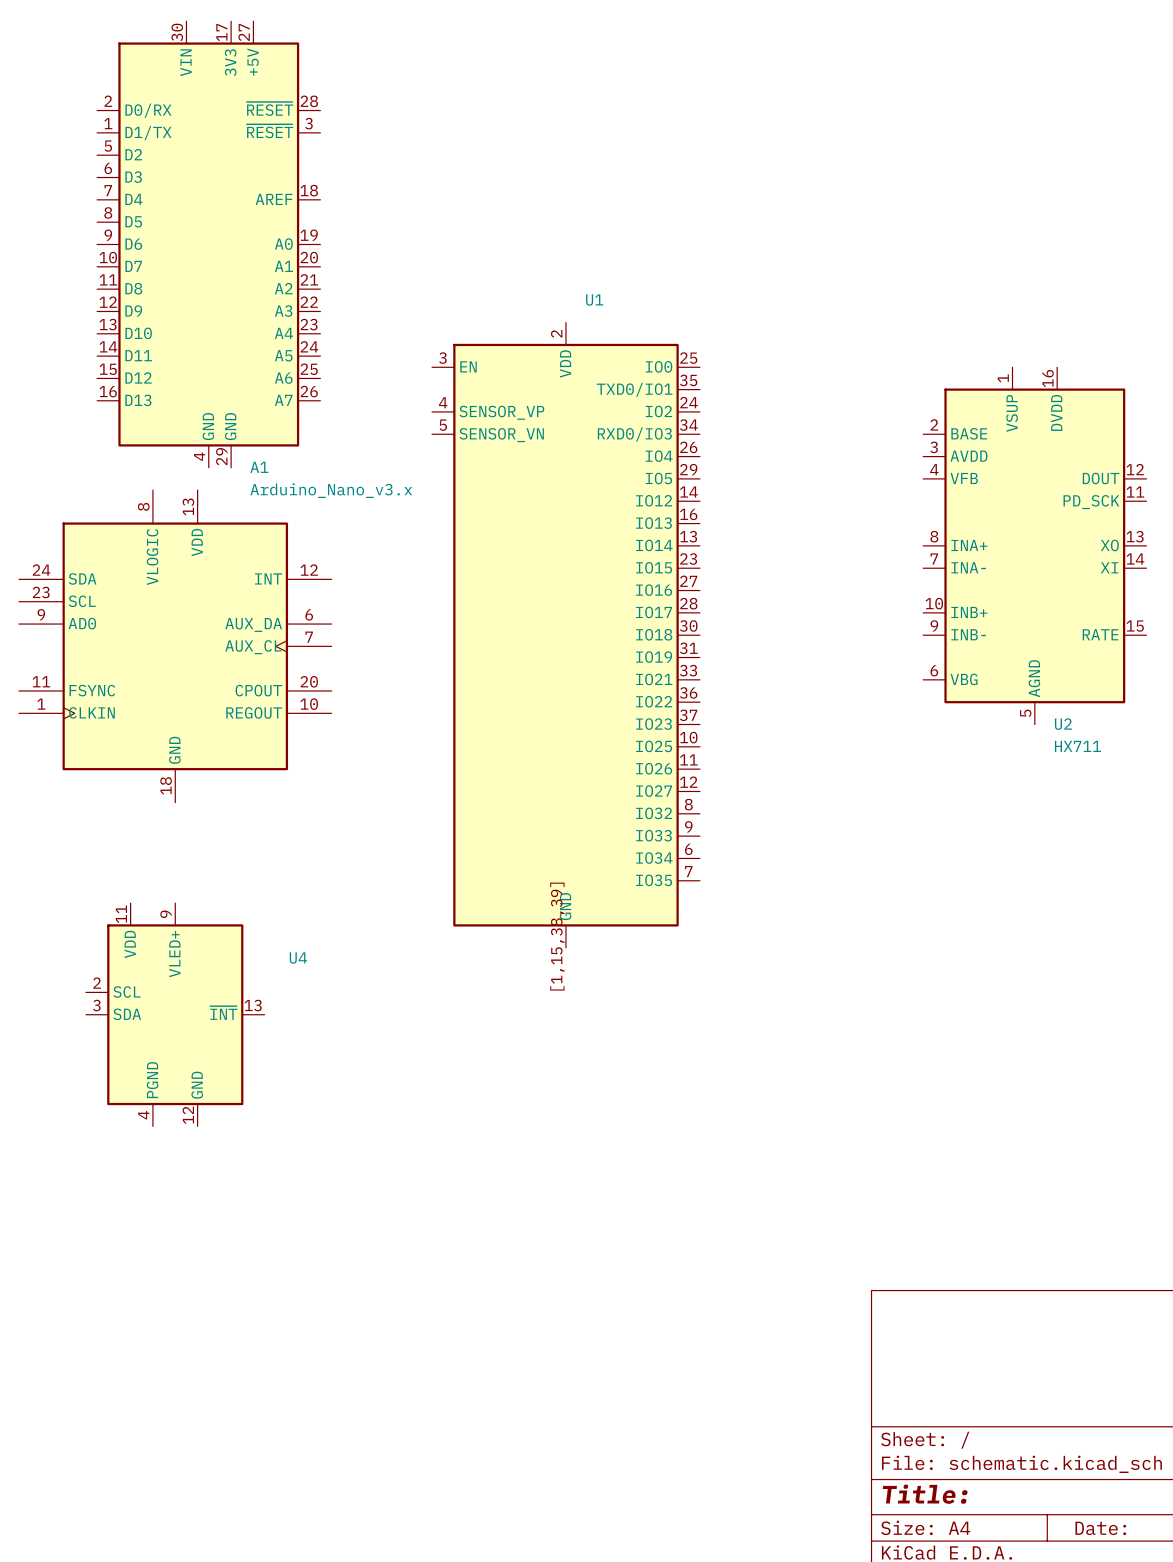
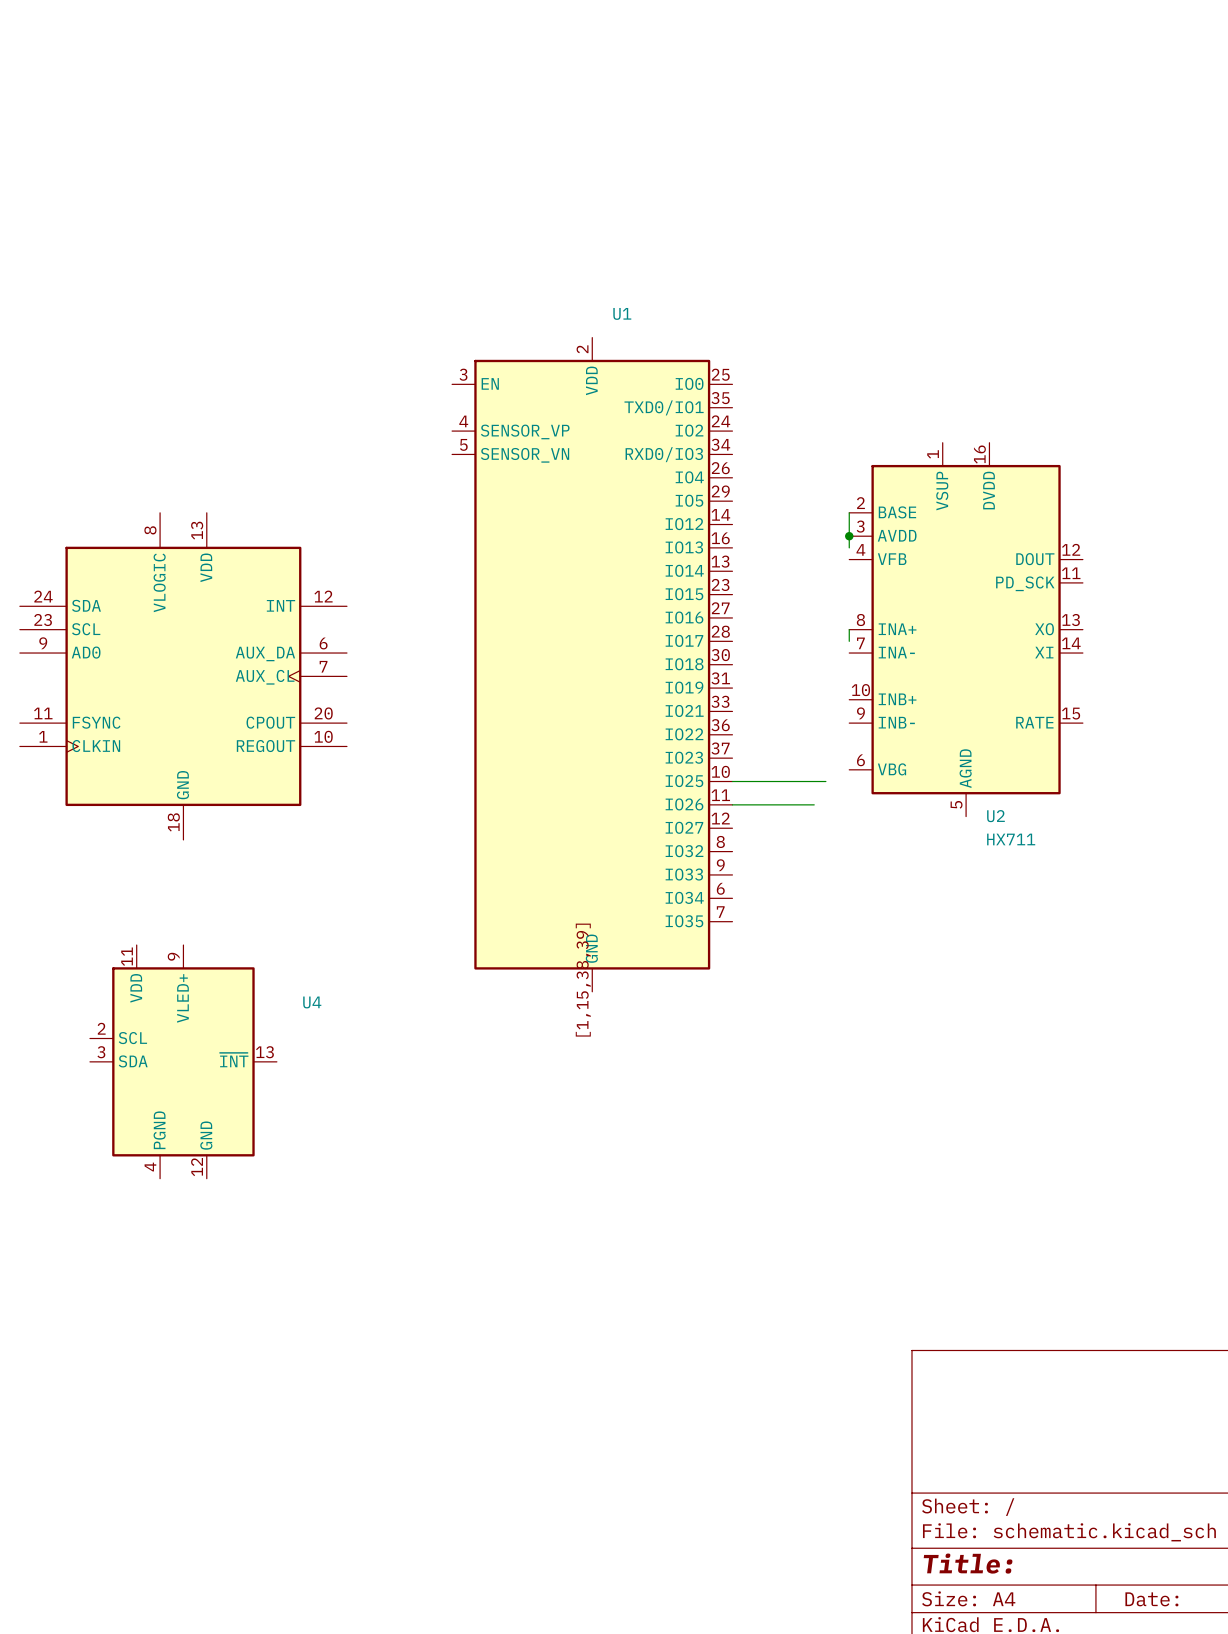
A1: Arduino_Nano_v3.x (208, 244) -> none
wire: none -> (849, 512) (849, 547)
junction: none -> (849, 536)
U2 position: (1034, 545) -> (966, 629)
wire: none -> (849, 629) (849, 641)
wire: none -> (732, 781) (825, 781)
wire: none -> (732, 804) (814, 804)

